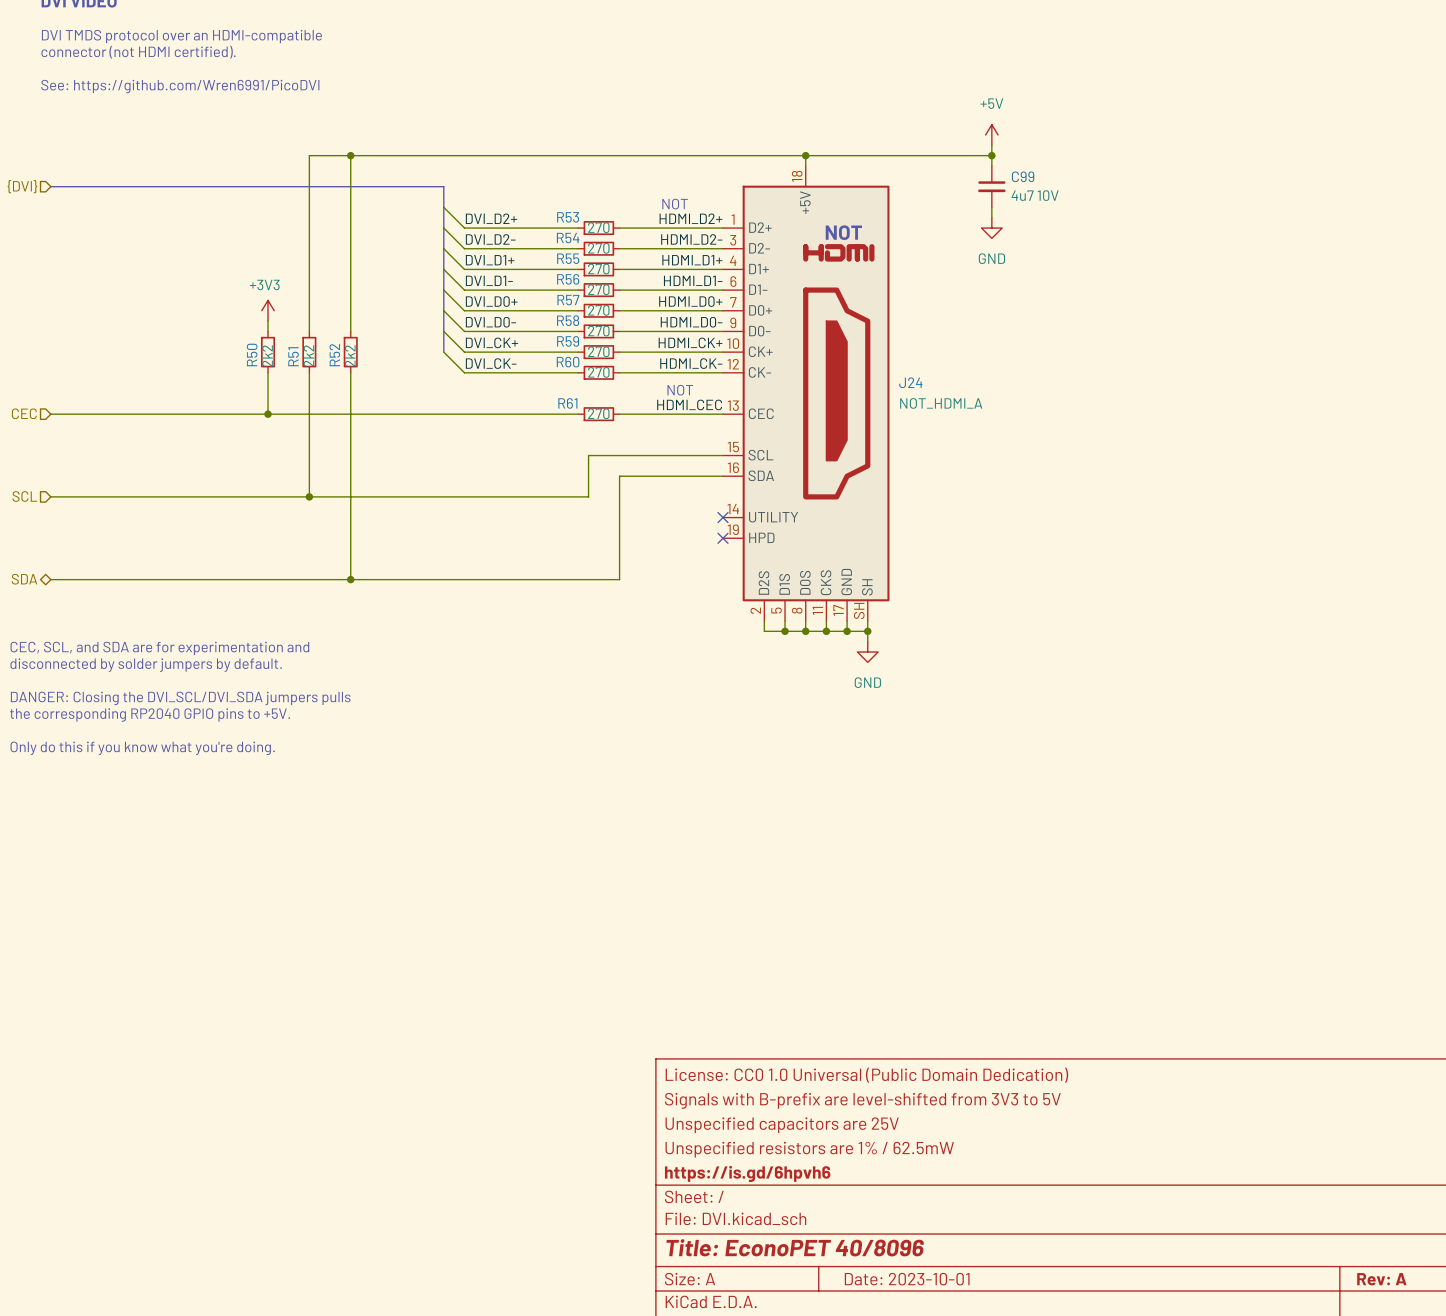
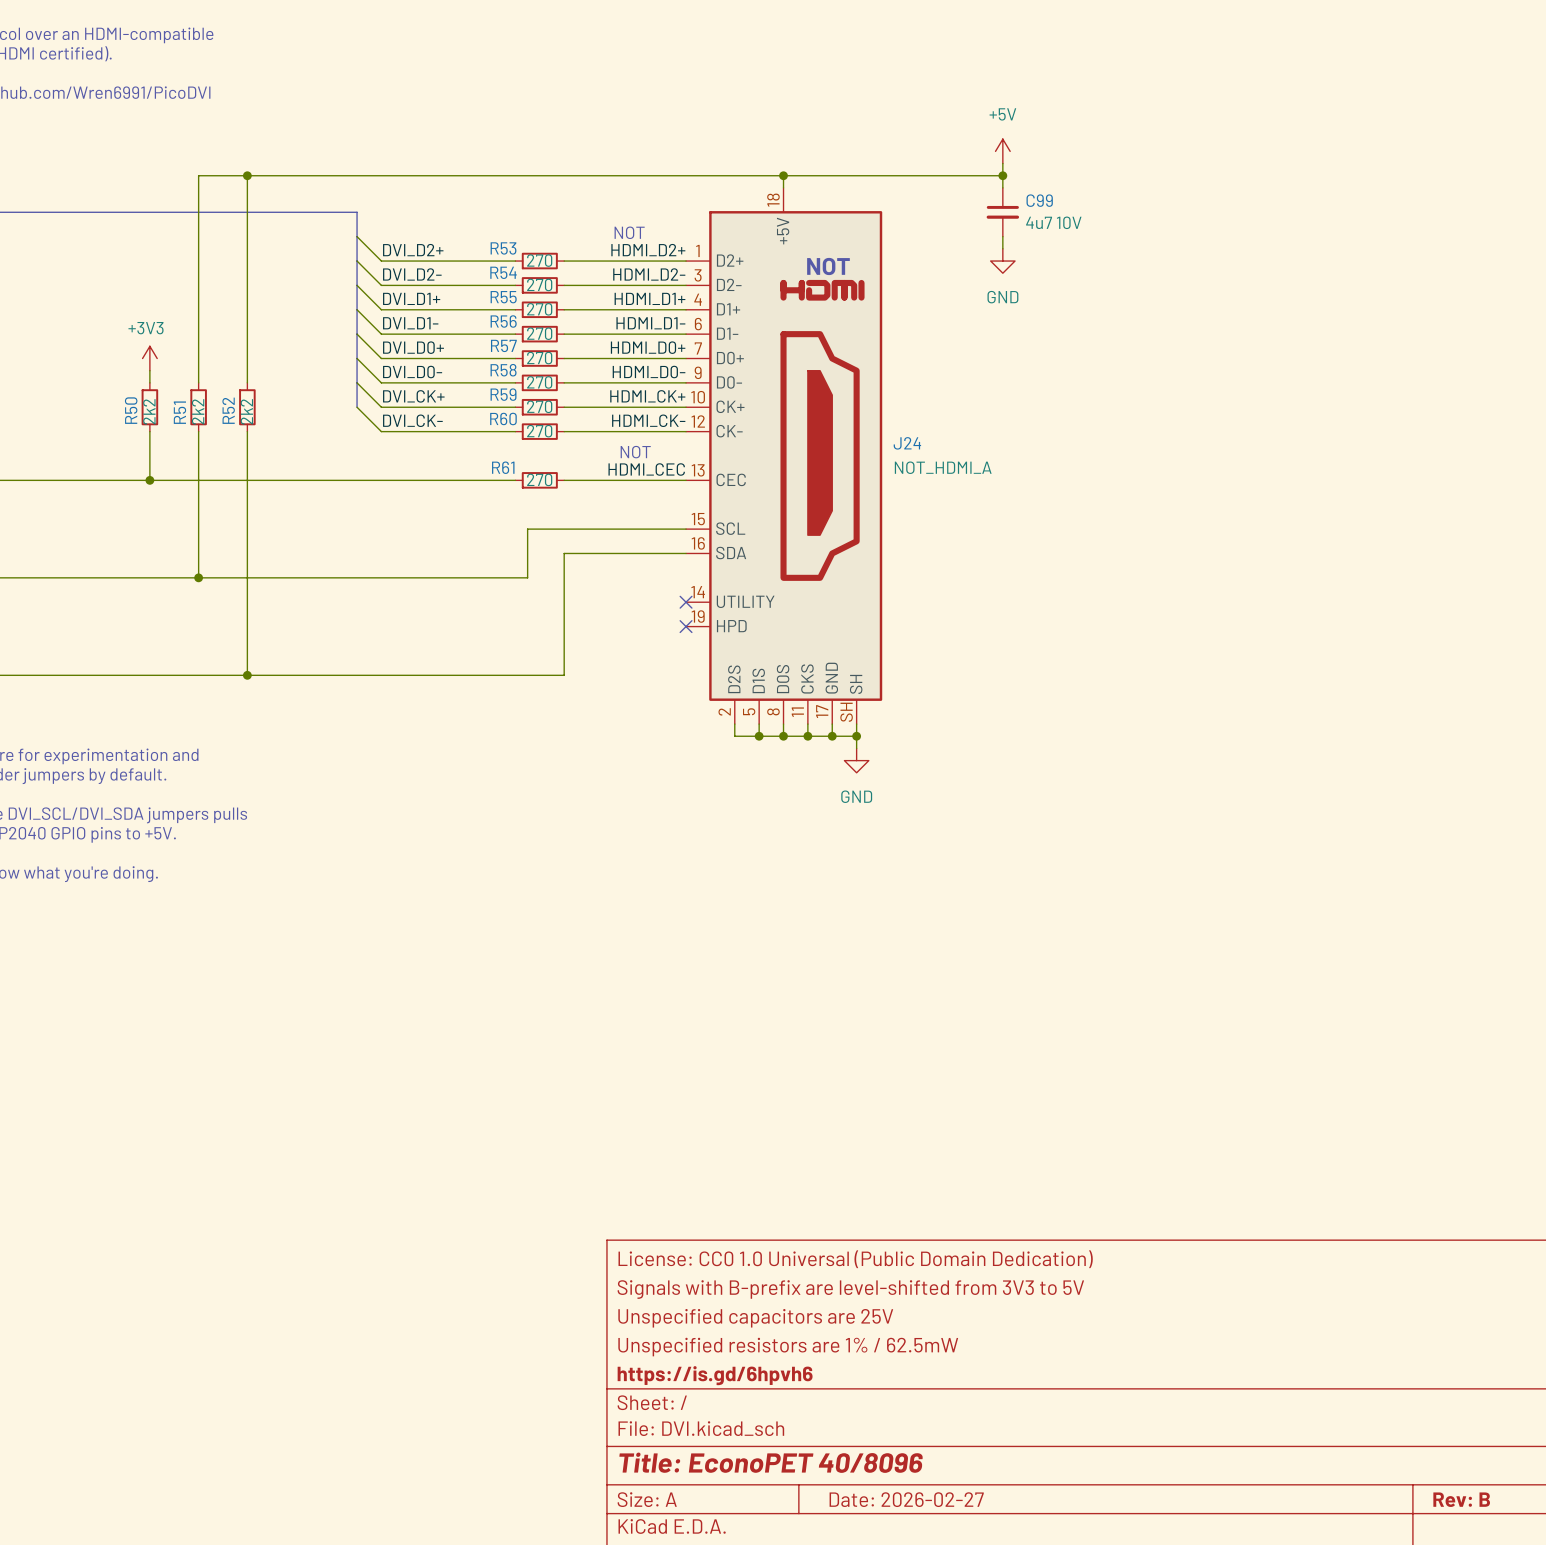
title block: Date: 2023-10-01 (907, 1279) -> Date: 2026-02-27 (906, 1499)
title block: Rev: A (1381, 1279) -> Rev: B (1461, 1499)

